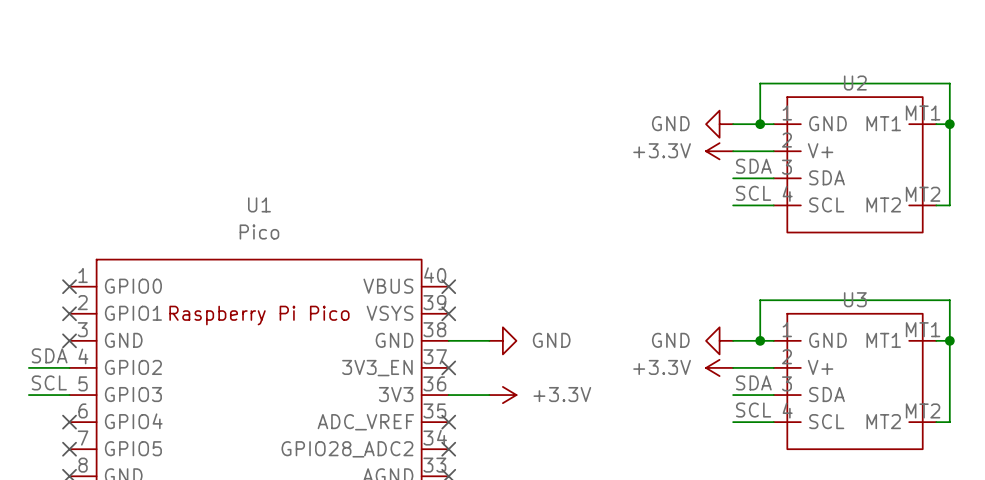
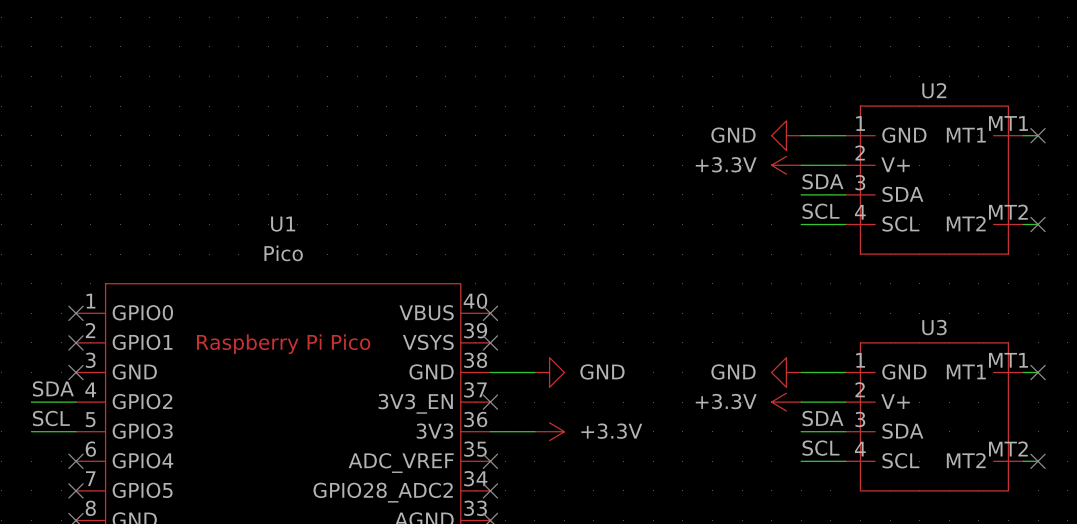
wire: (760, 124) (760, 83) (949, 83) (949, 205) -> none
junction: (760, 124) -> none
junction: (949, 124) -> none
no-connect mark: none -> (1038, 135)
no-connect mark: none -> (1038, 224)
wire: (760, 340) (760, 300) (949, 300) (949, 422) -> none
junction: (760, 340) -> none
junction: (949, 340) -> none
no-connect mark: none -> (1038, 372)
no-connect mark: none -> (1038, 461)

